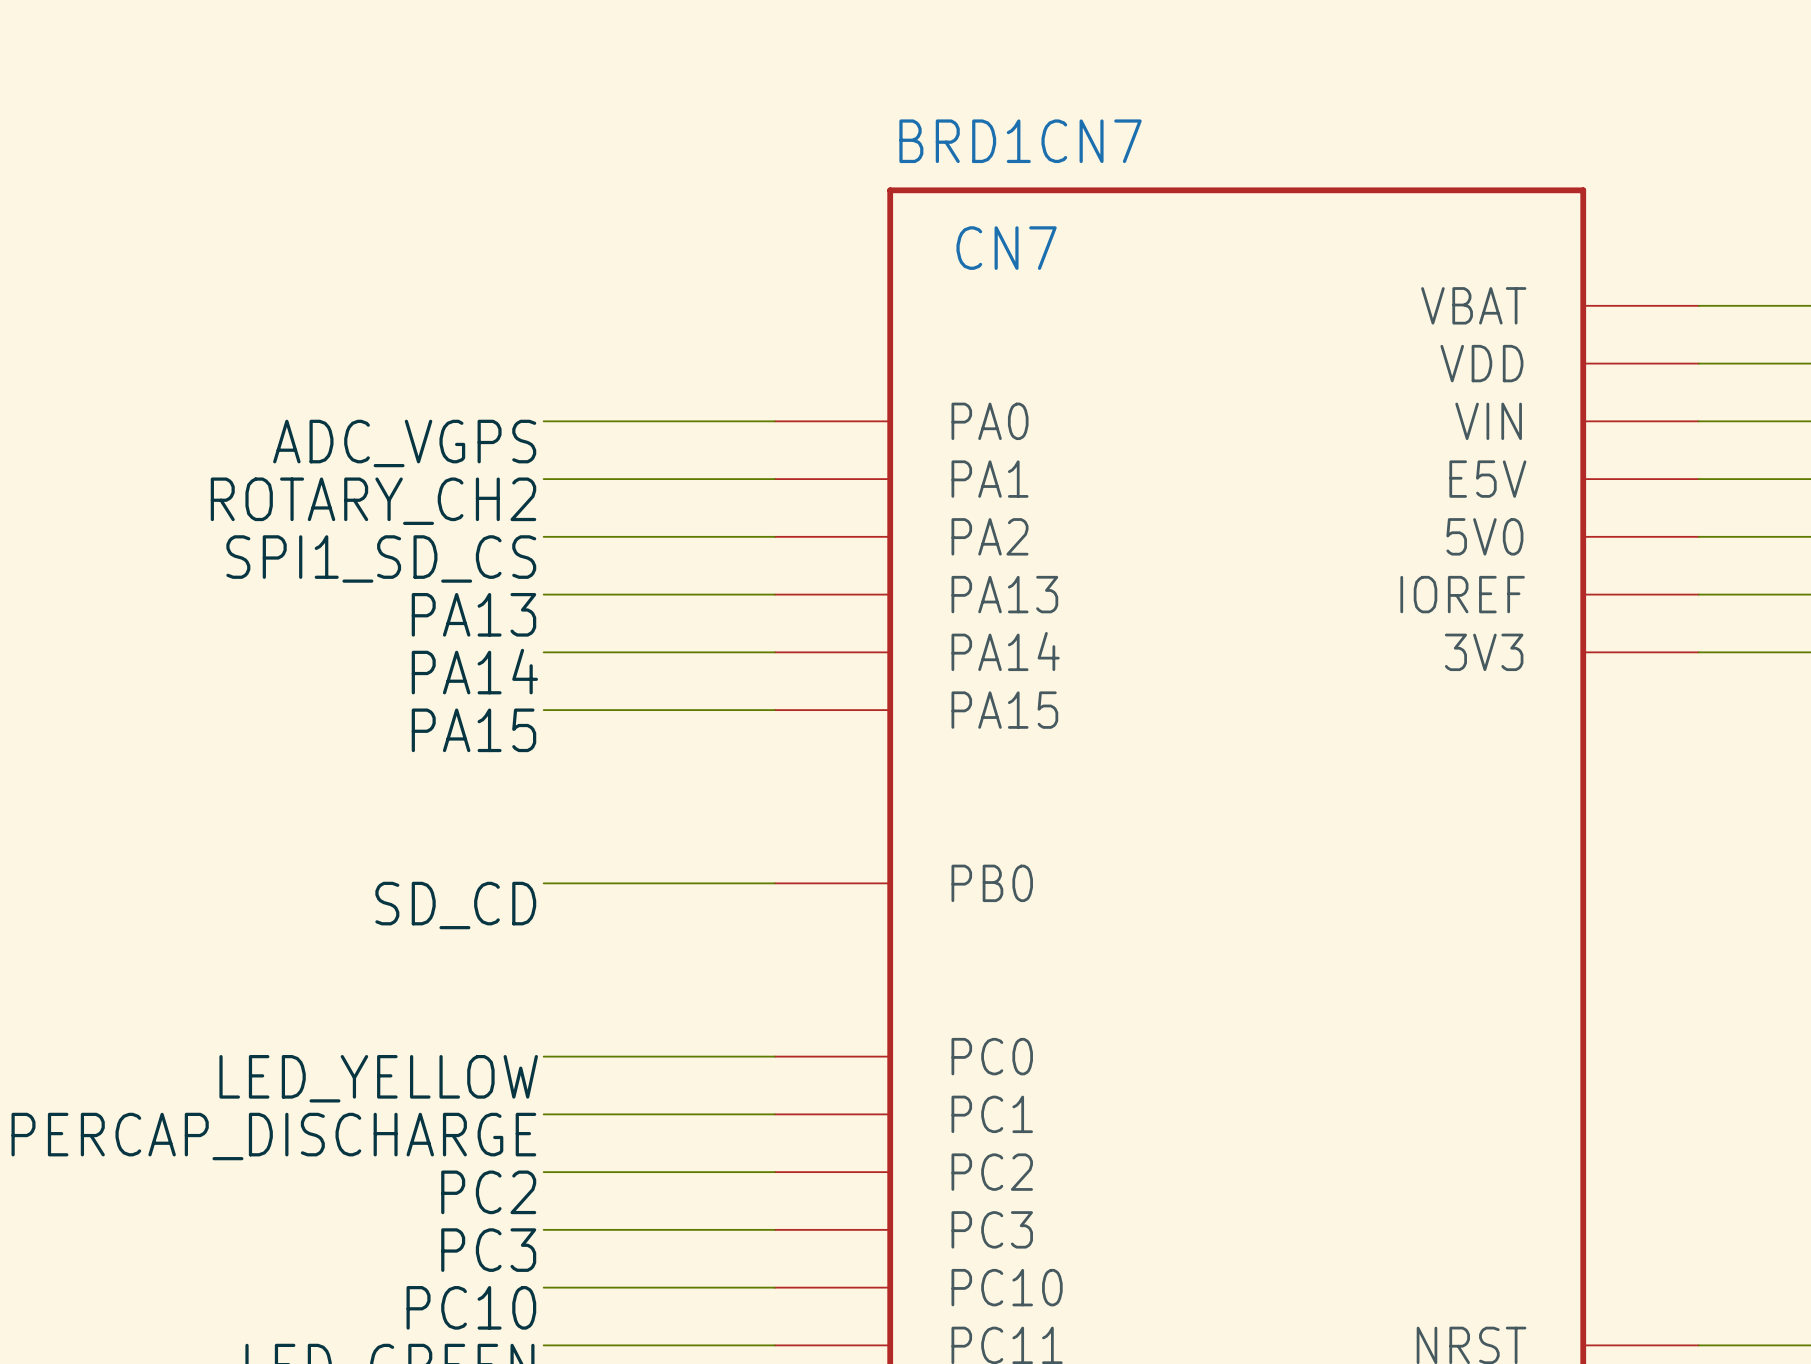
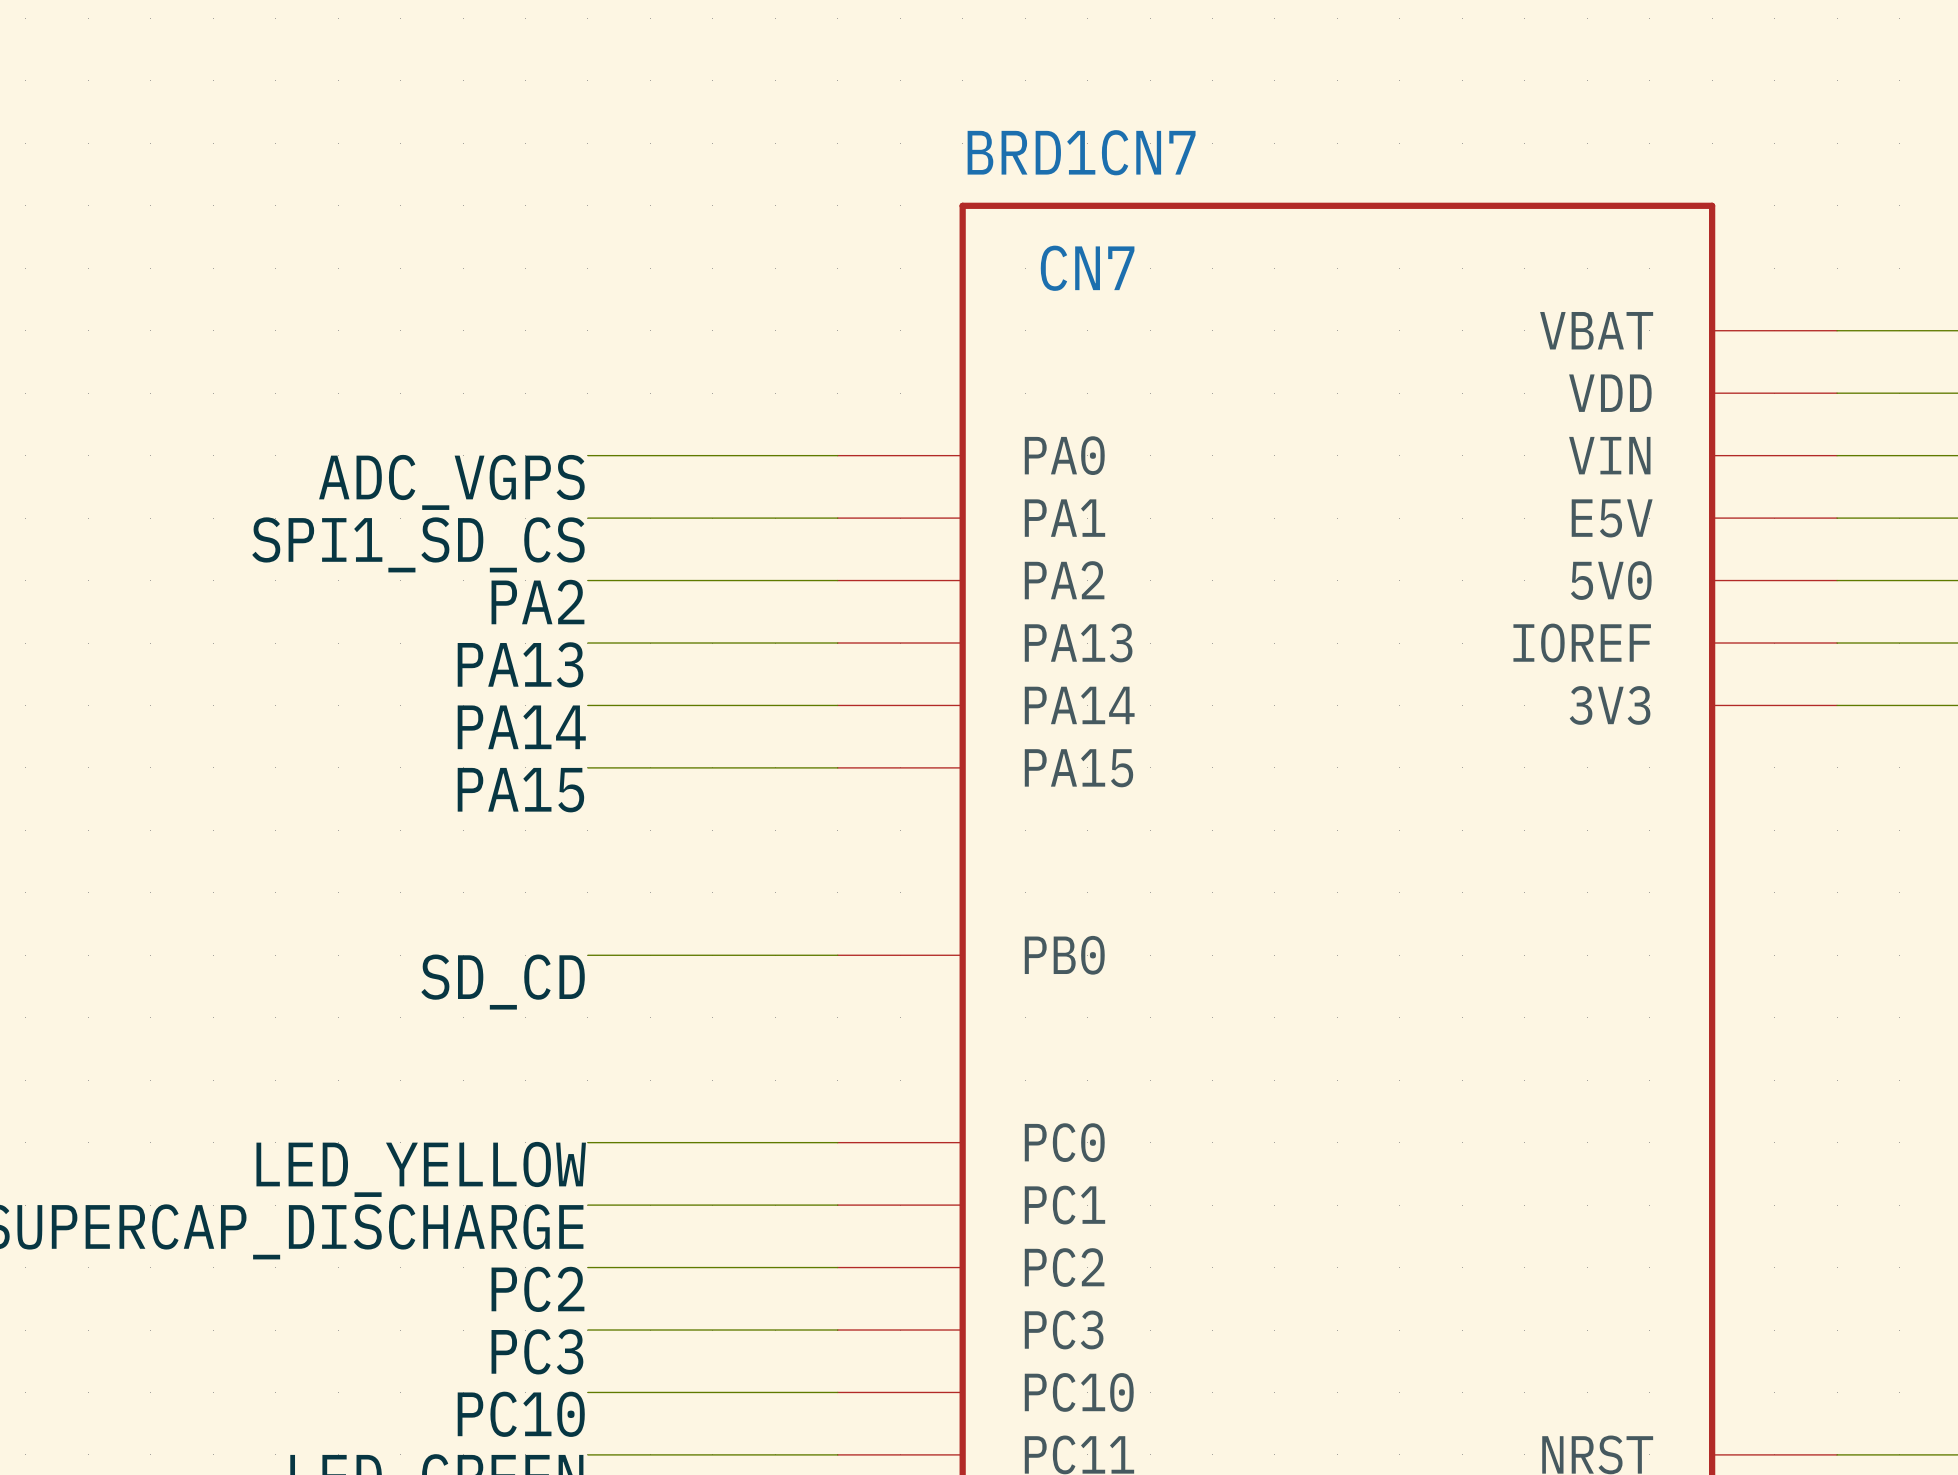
label: ROTARY_CH2 (373, 501) -> SPI1_SD_CS (418, 544)
label: SPI1_SD_CS (381, 558) -> PA2 (537, 602)

